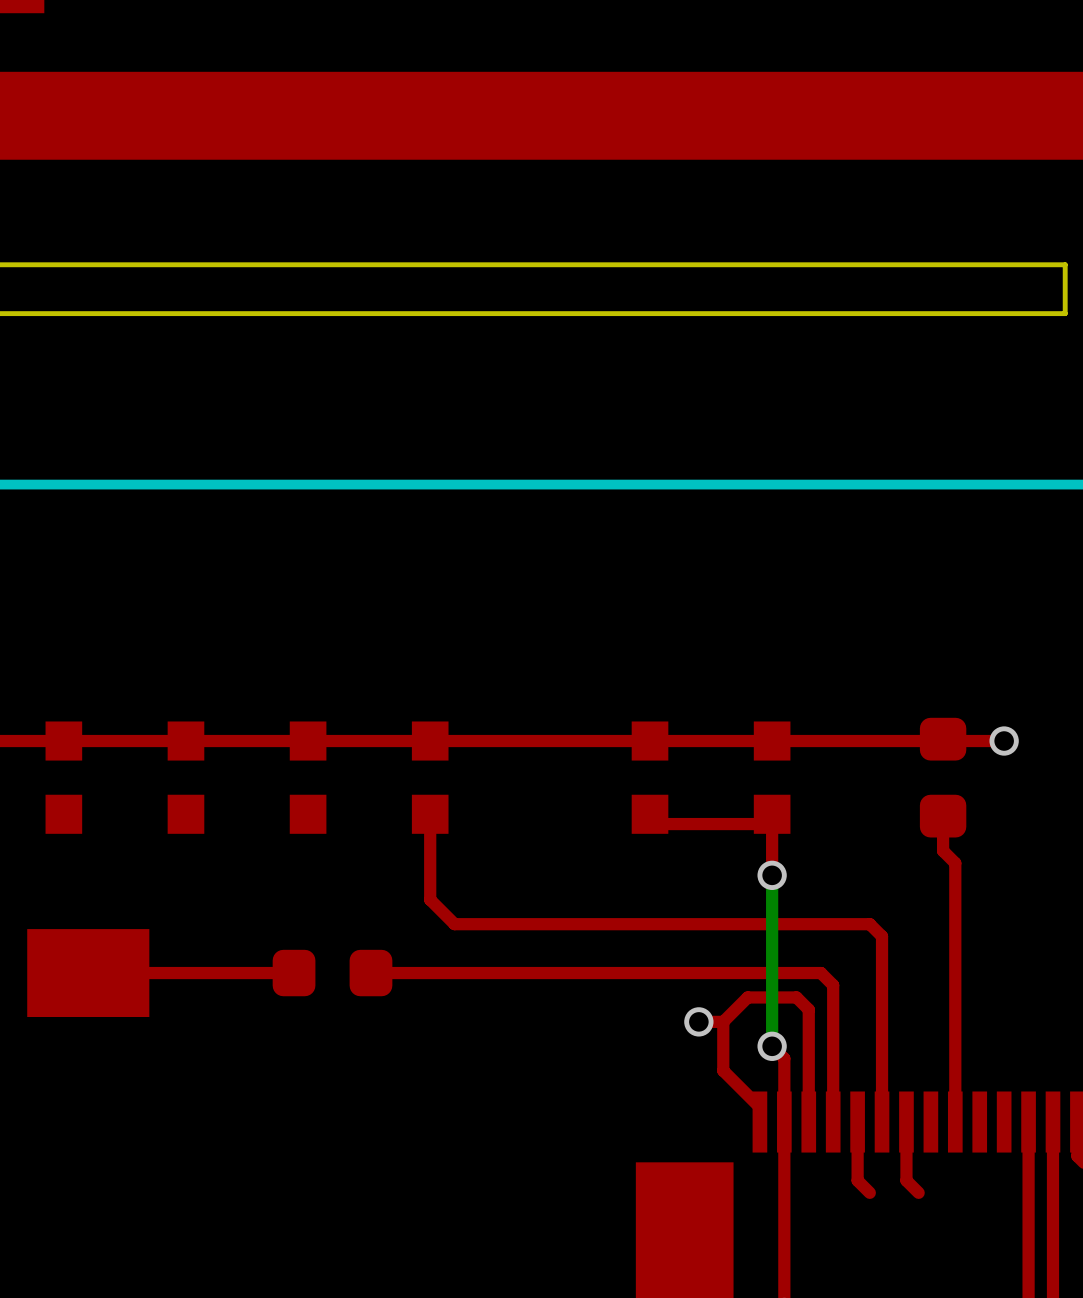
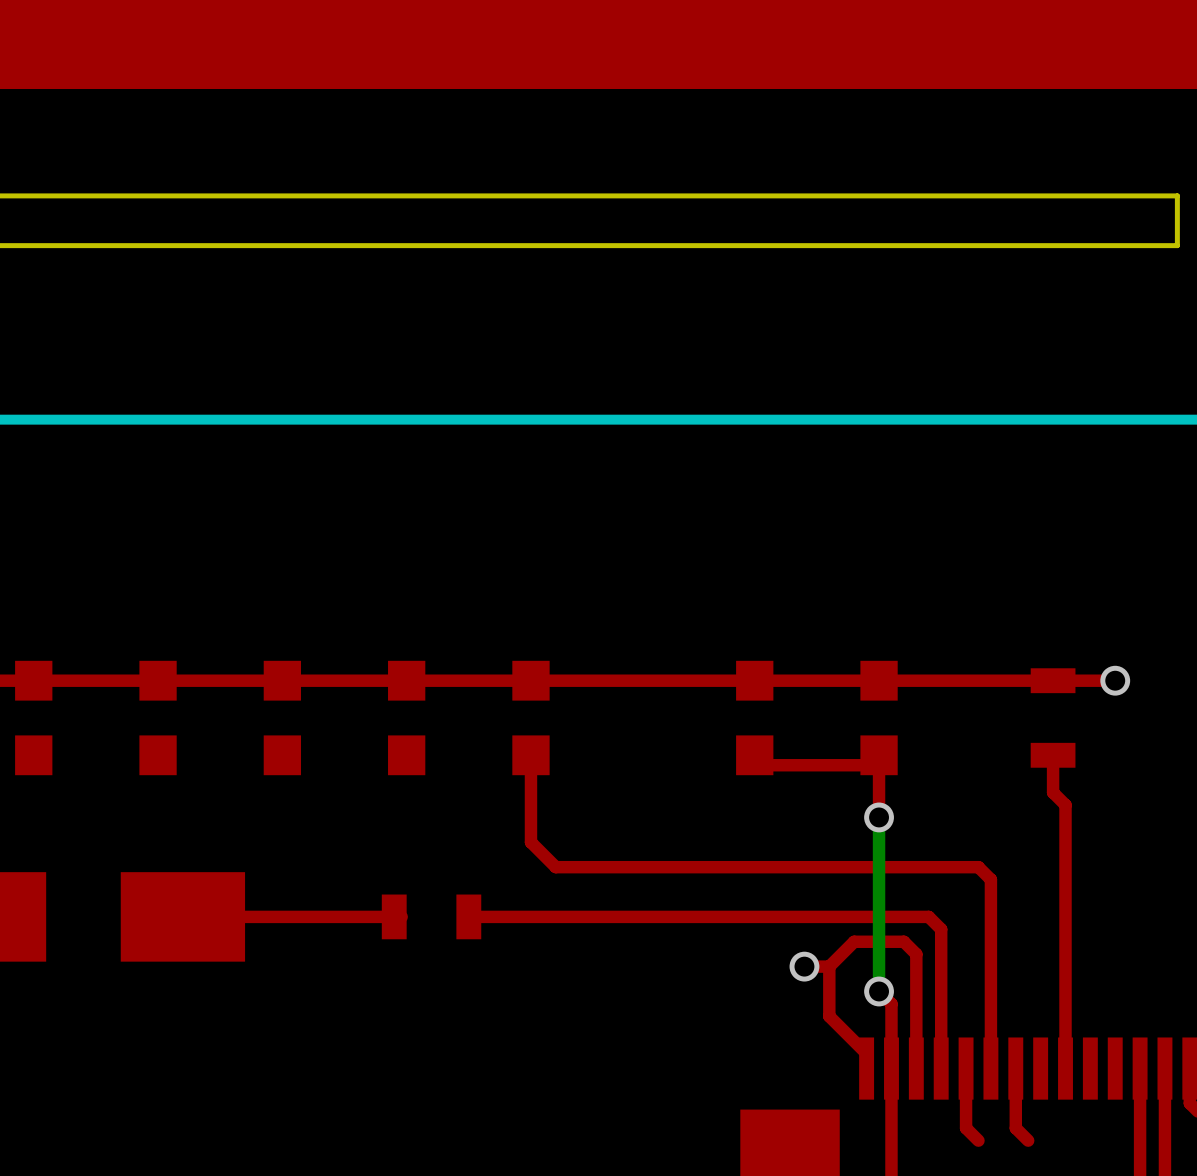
part footprint: [919, 717, 967, 838] -> [1030, 668, 1076, 768]
part footprint: [272, 949, 393, 997] -> [381, 894, 482, 940]

